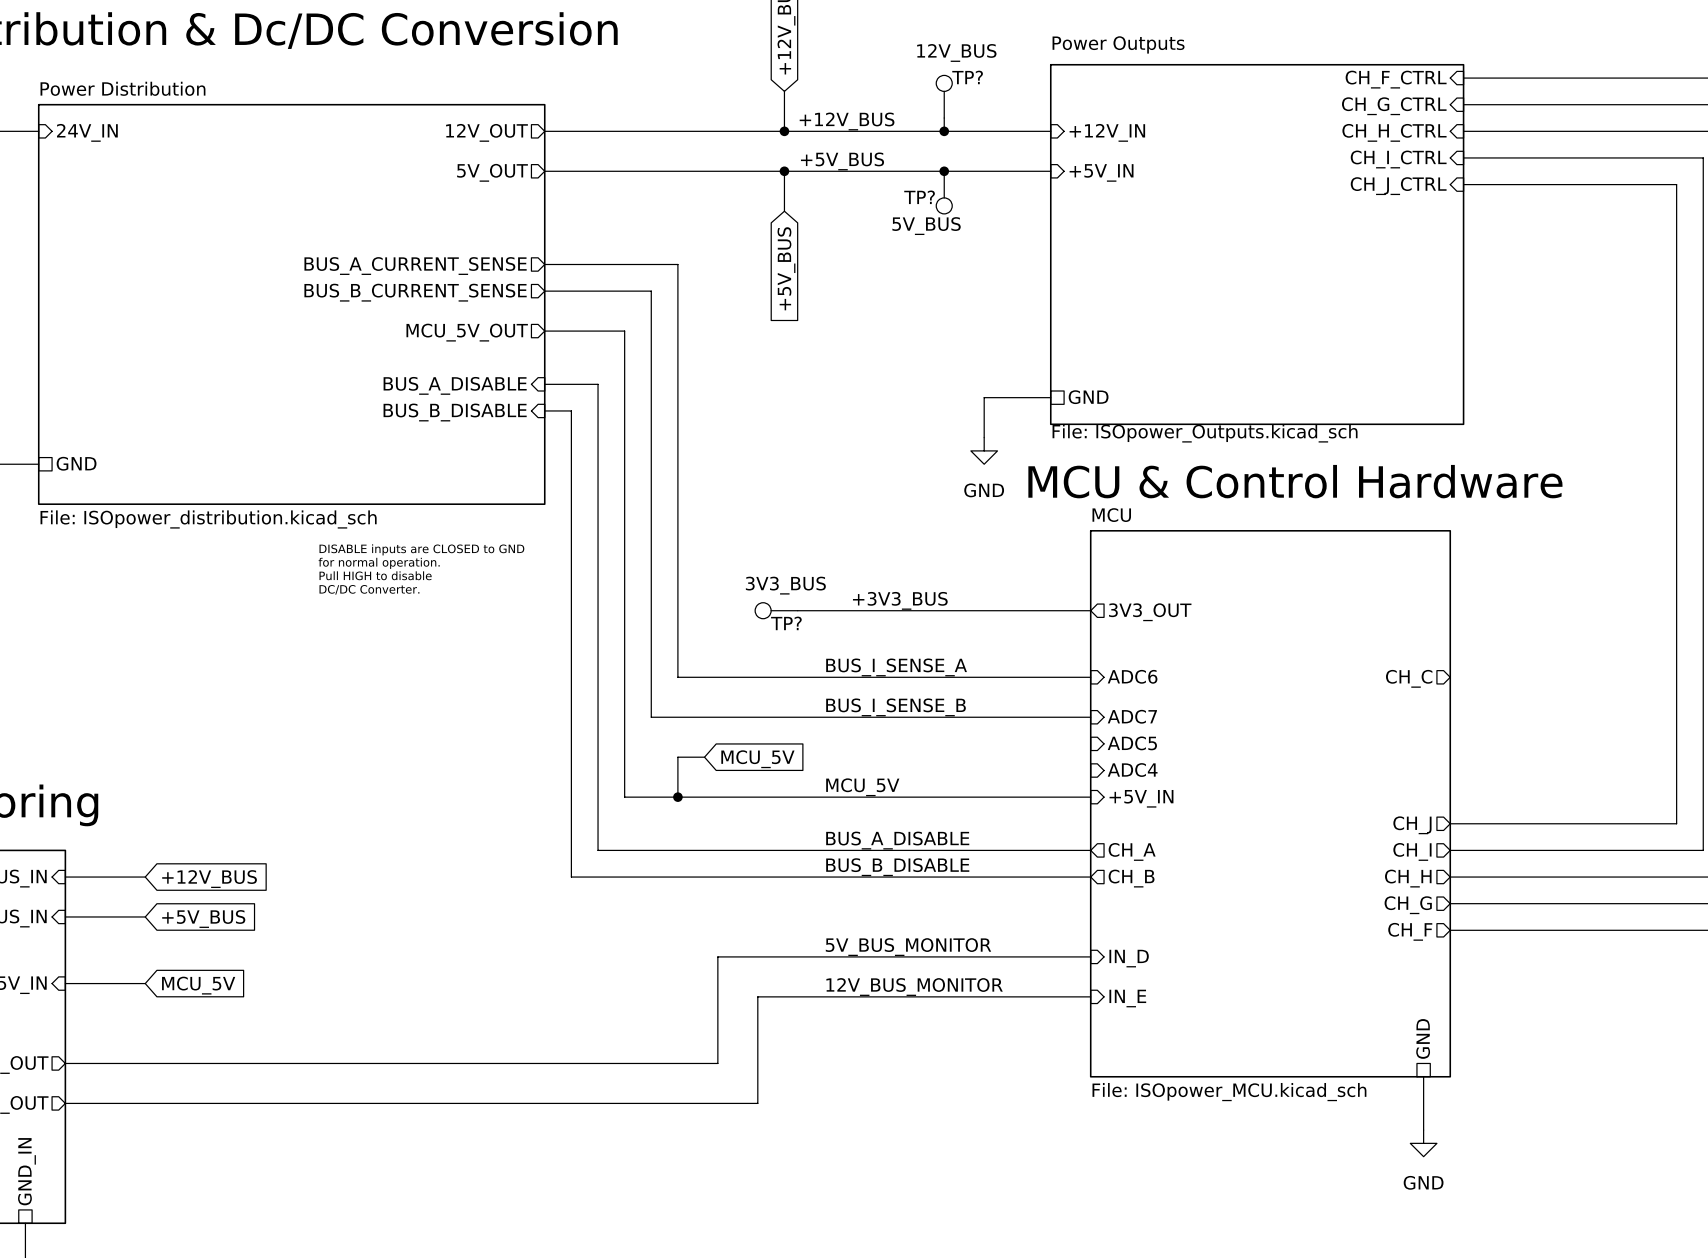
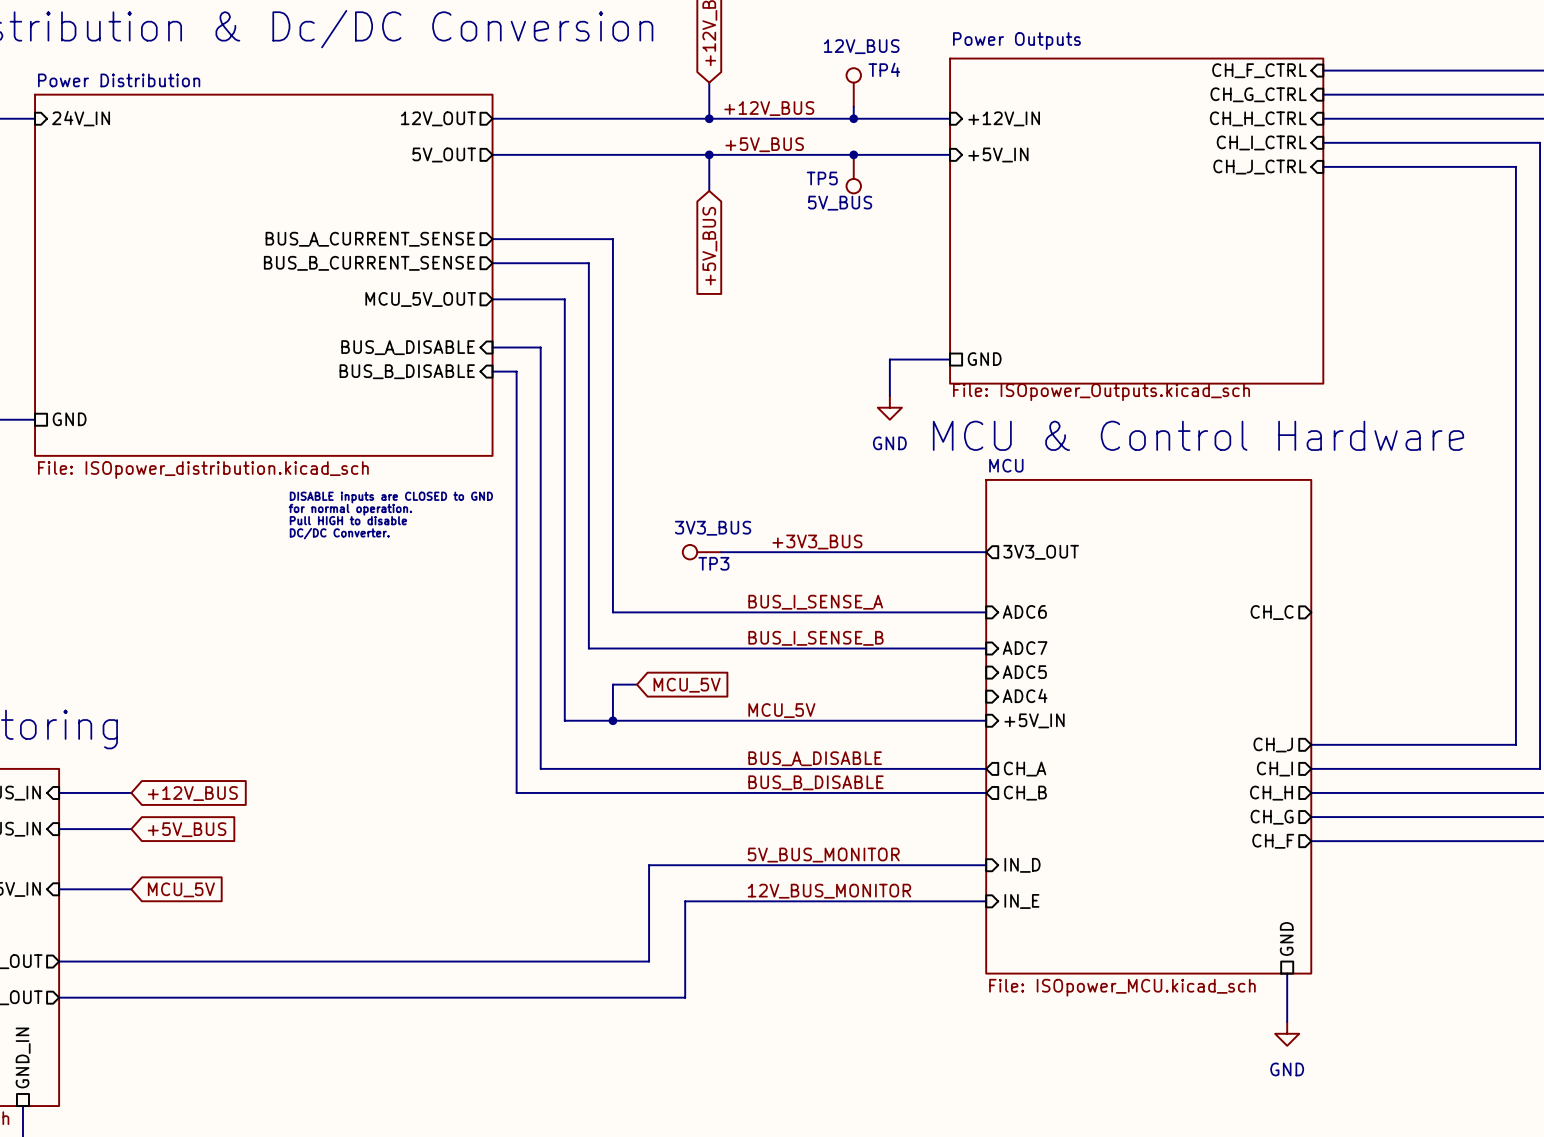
TP? name: TP? (967, 77) -> TP4 (884, 69)
TP? name: TP? (919, 197) -> TP5 (822, 178)
TP? name: TP? (786, 623) -> TP3 (713, 563)

